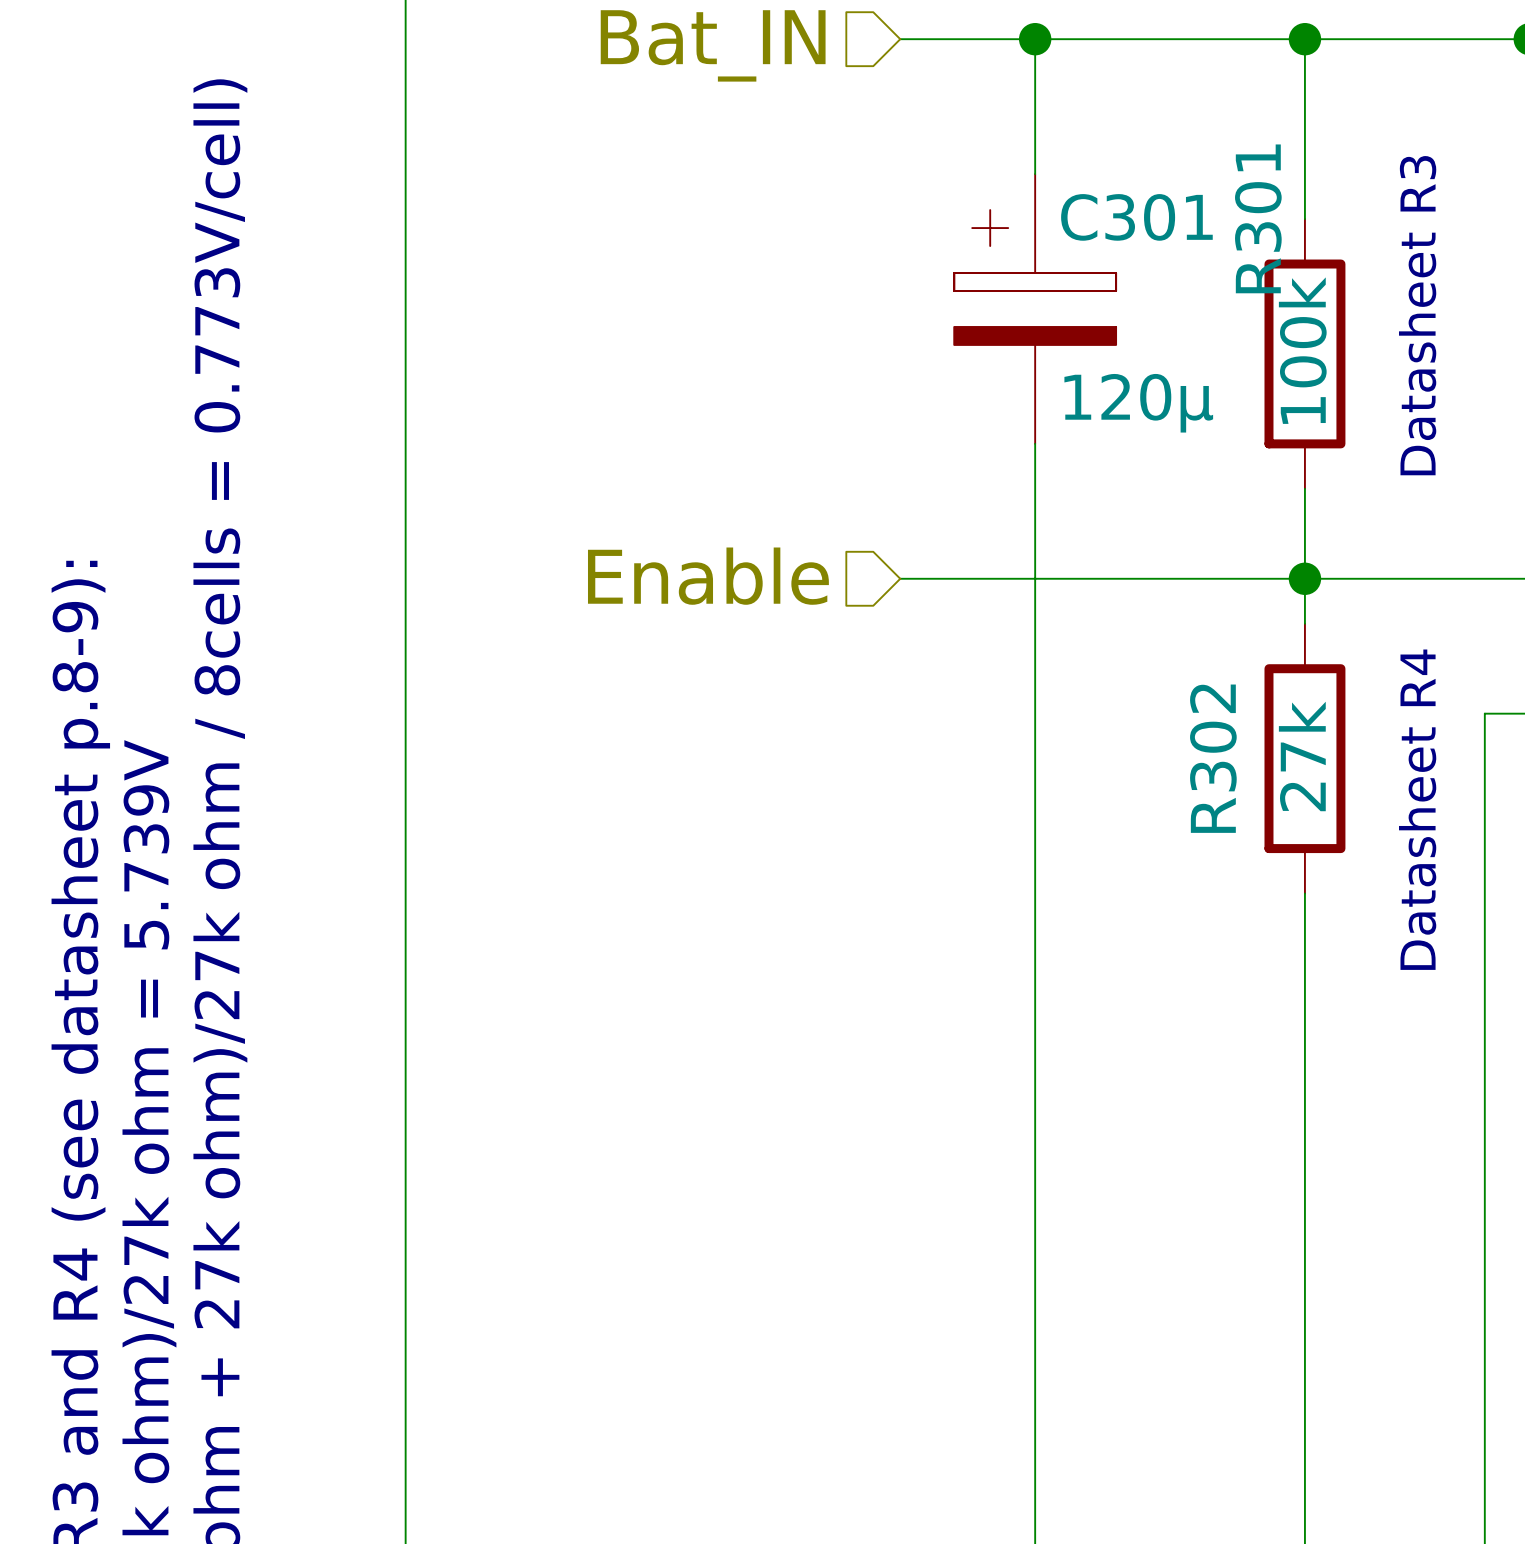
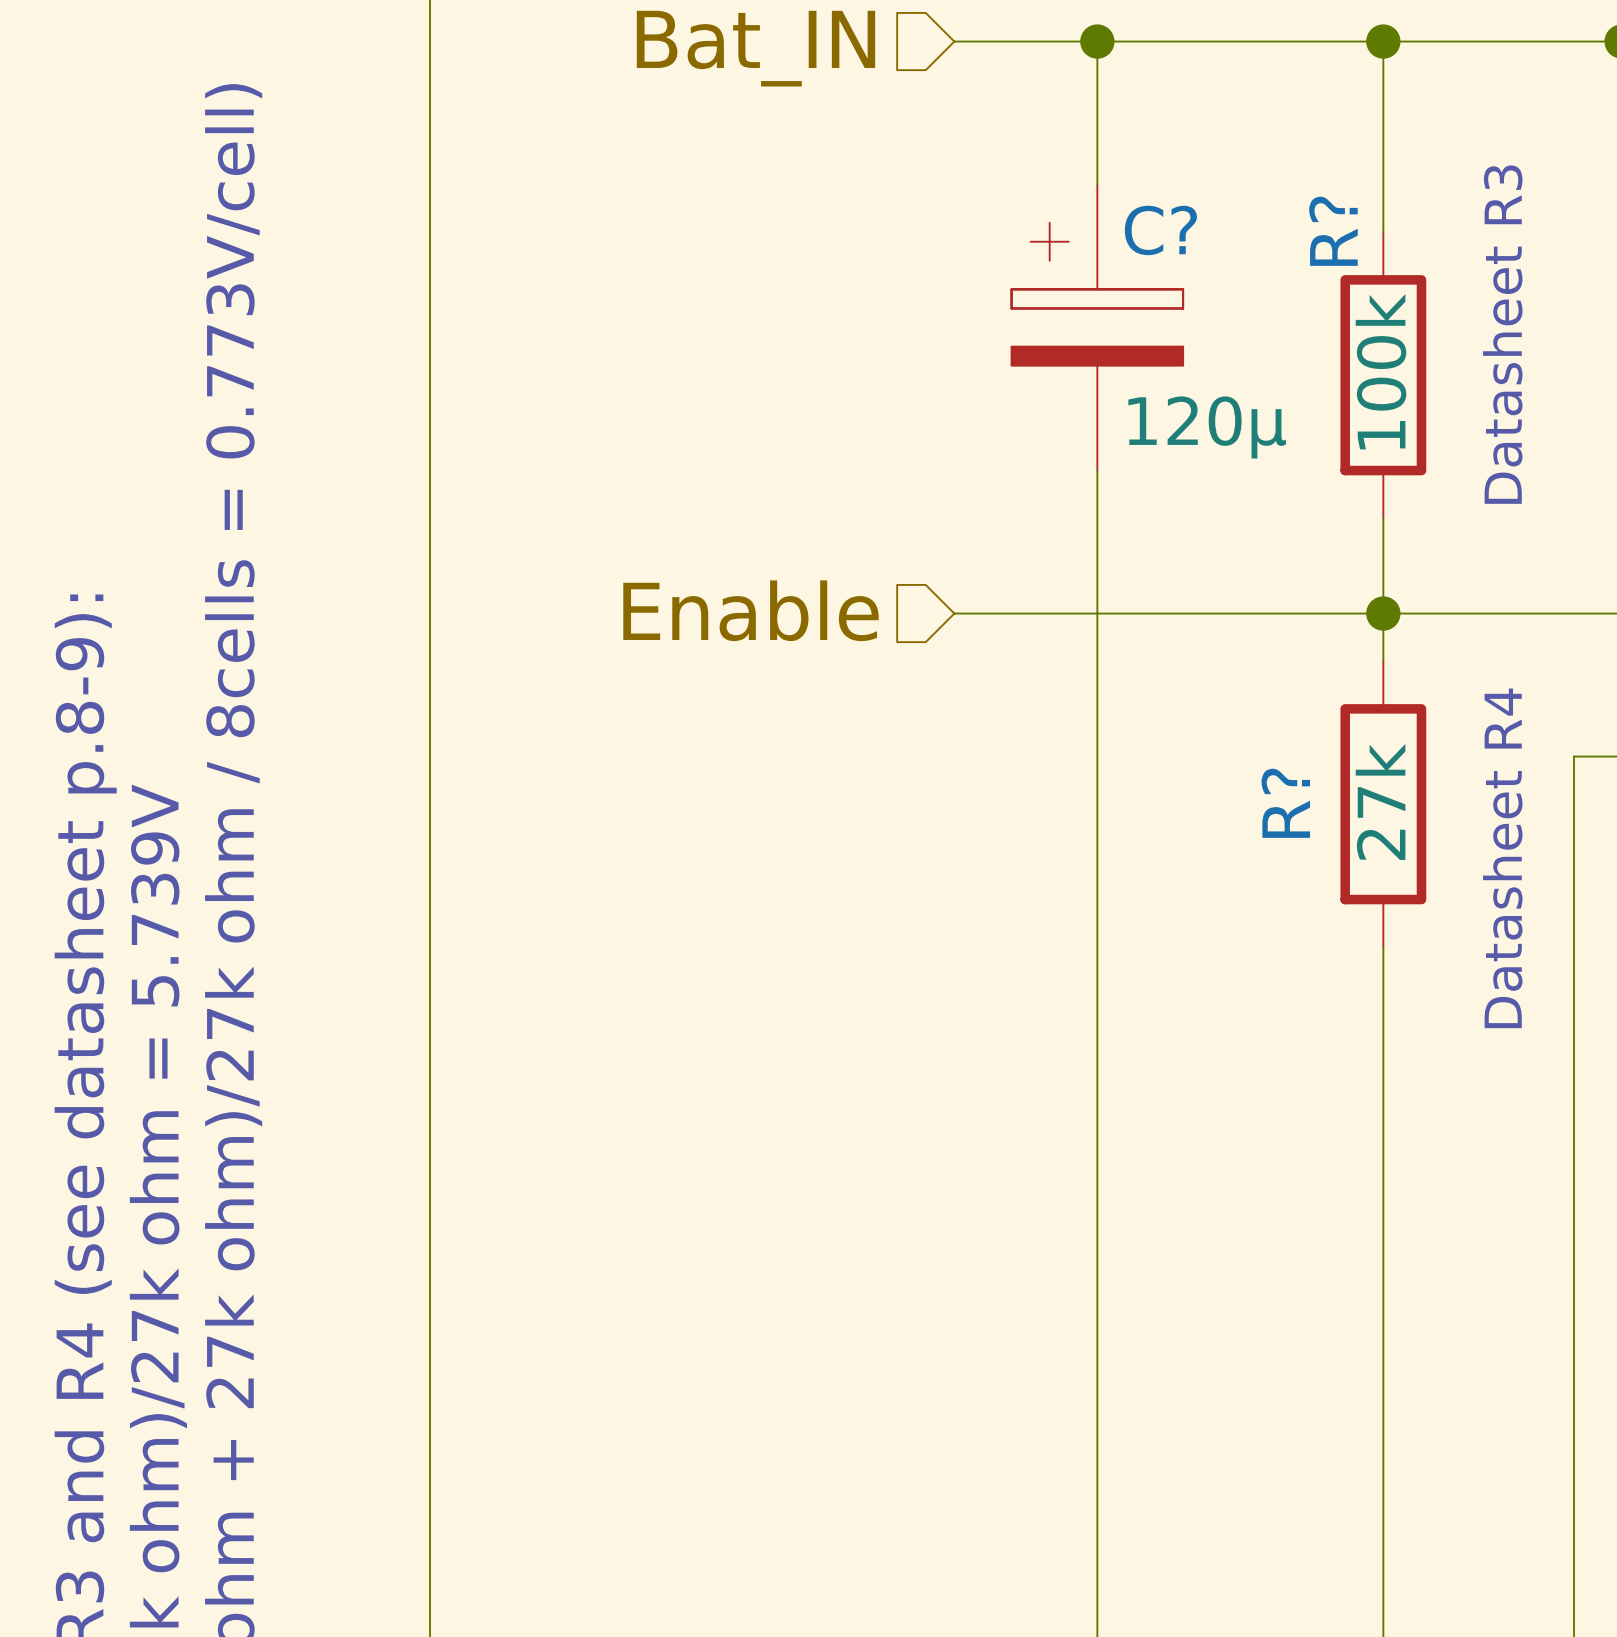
C301 name: C301 (1136, 217) -> C? (1160, 230)
R301 name: R301 (1258, 218) -> R? (1333, 231)
R302 name: R302 (1213, 758) -> R? (1285, 803)

